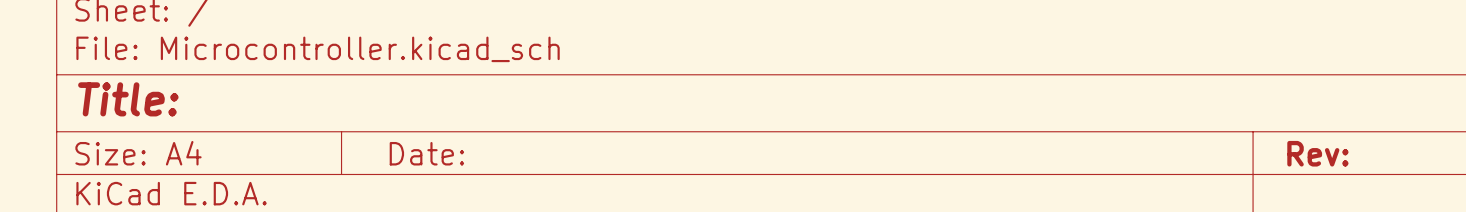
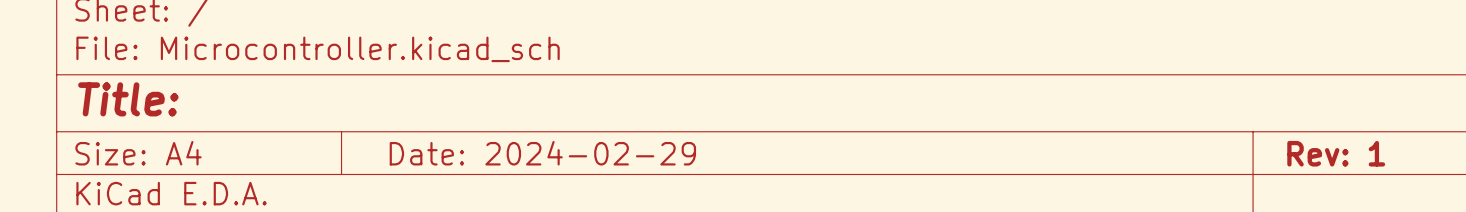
title block: Date: (426, 153) -> Date: 2024-02-29 (542, 153)
title block: Rev: (1317, 153) -> Rev: 1 (1336, 153)

